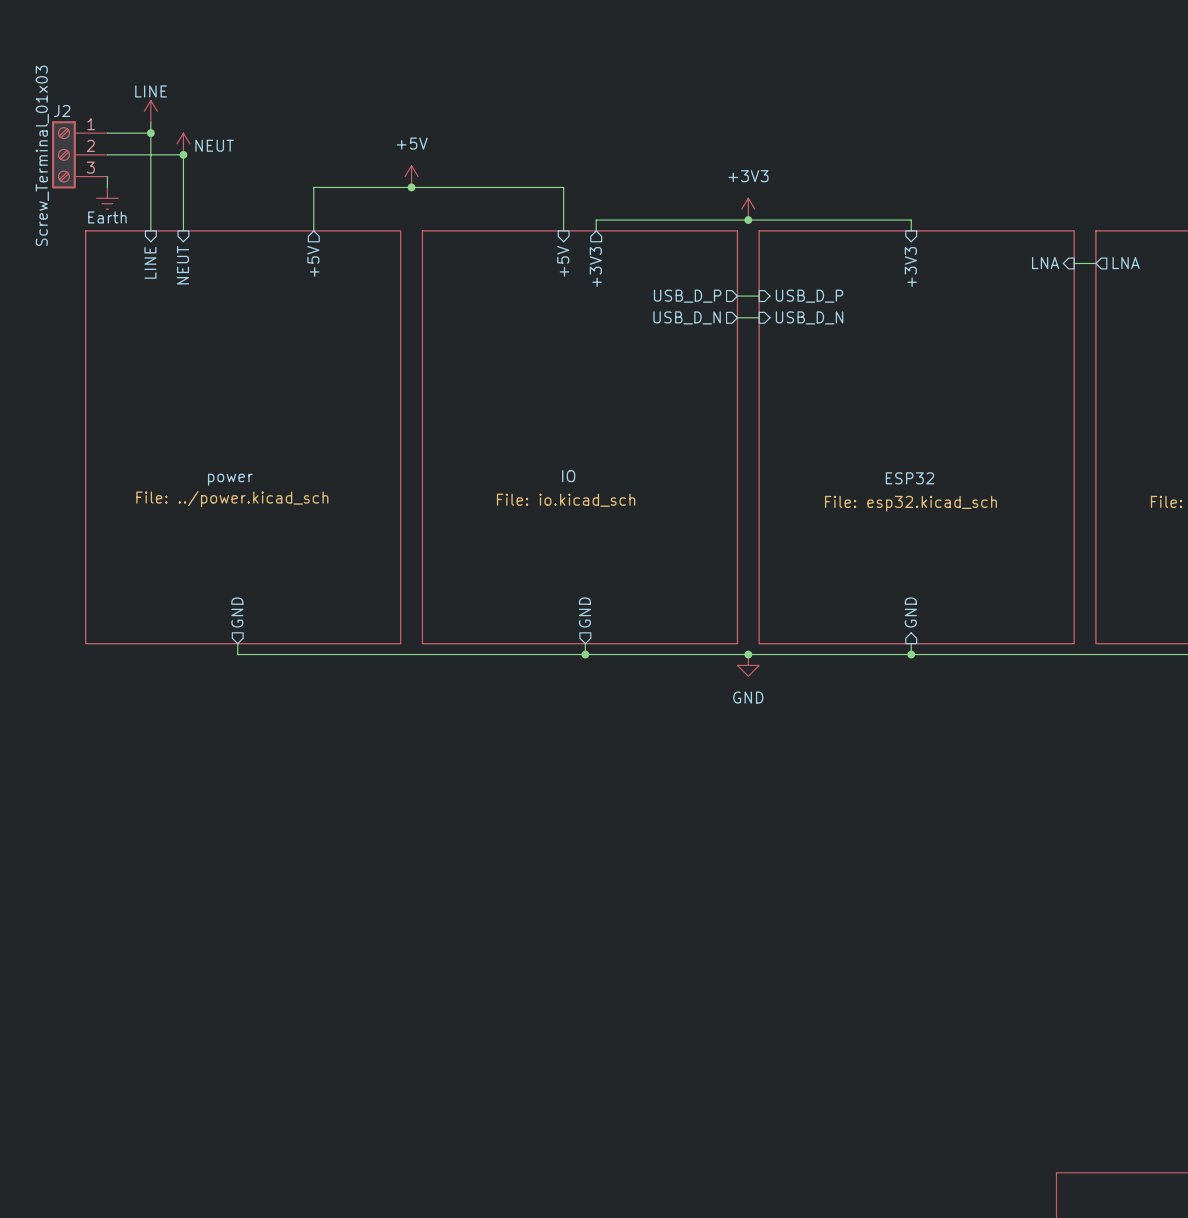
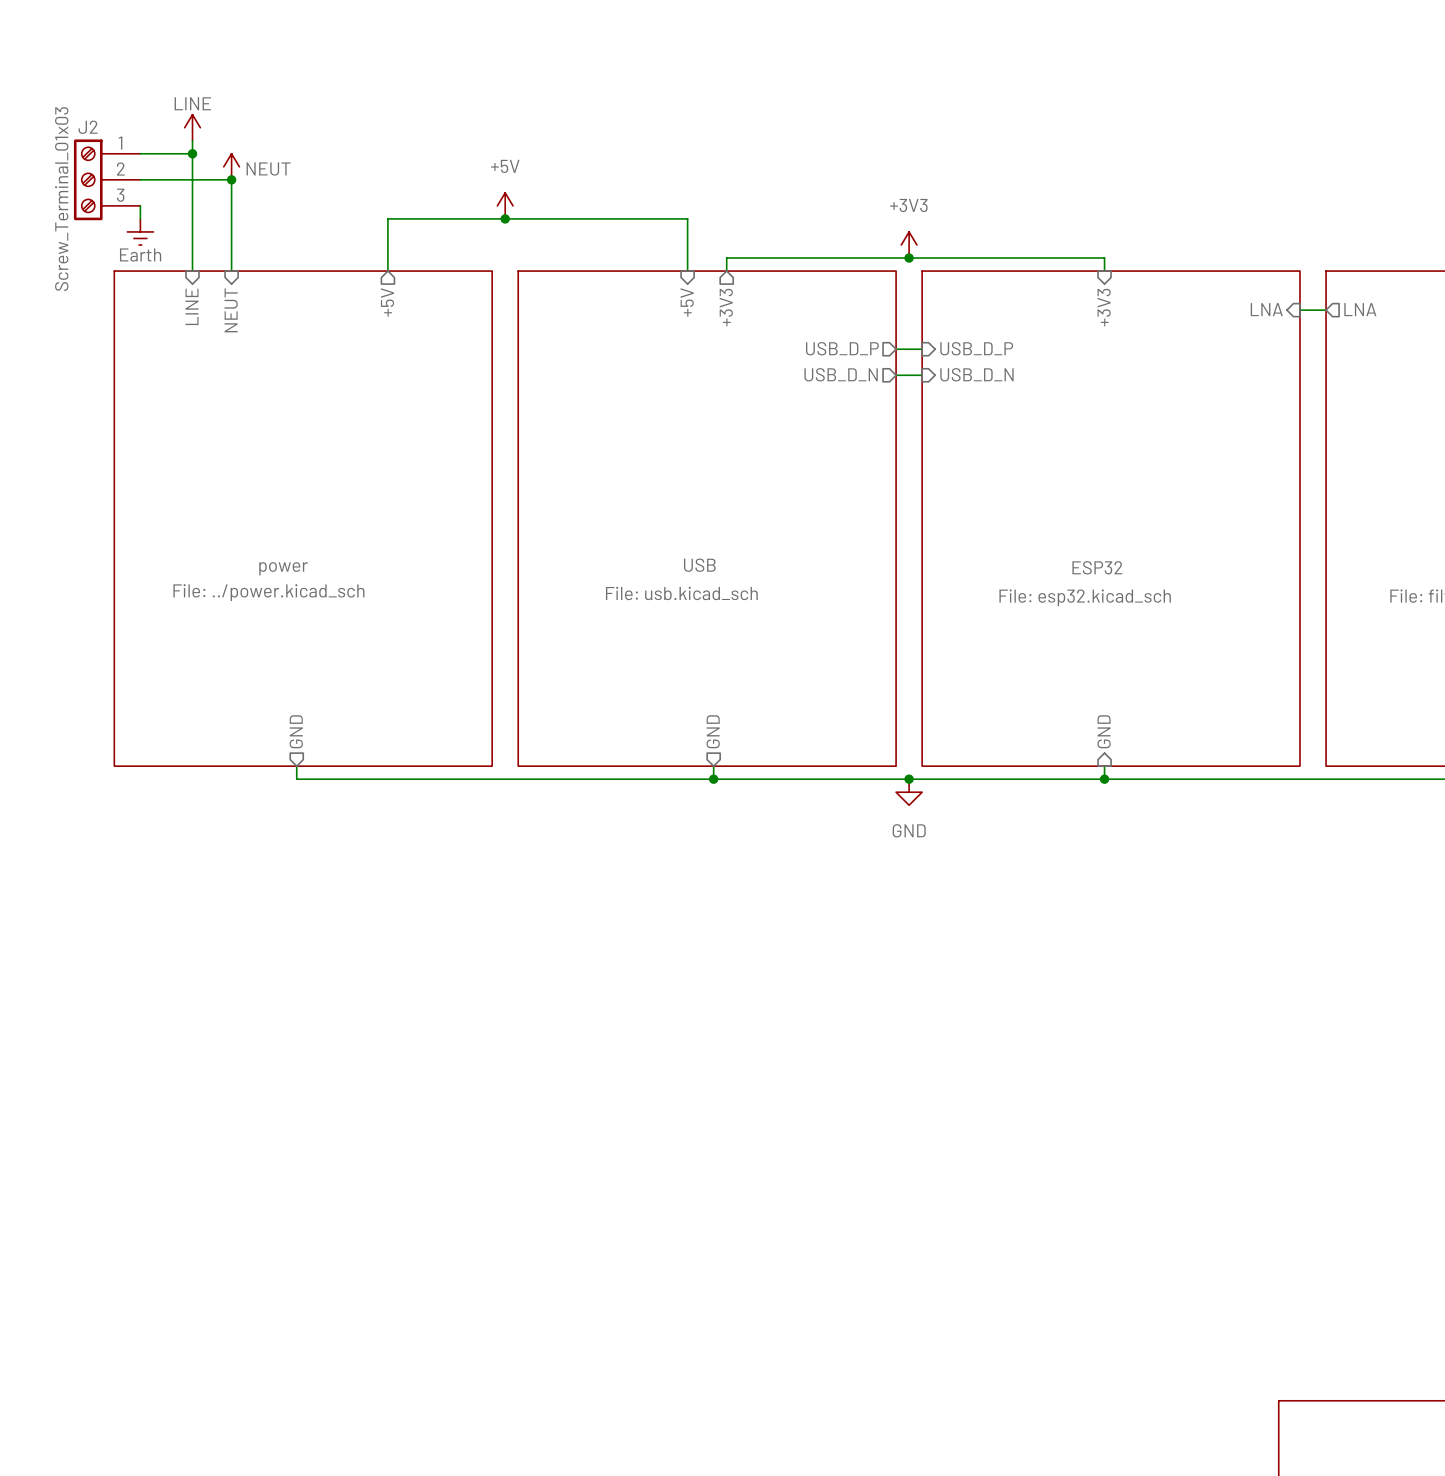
sheet IO name: IO (568, 476) -> USB (699, 565)
sheet IO value: File: io.kicad_sch (566, 500) -> File: usb.kicad_sch (681, 593)

